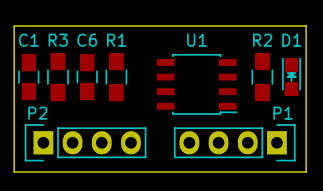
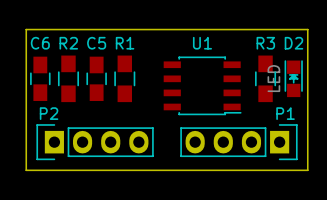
C1 name: C1 (28, 40) -> C6 (40, 43)
R3 name: R3 (58, 40) -> R2 (68, 43)
C6 name: C6 (87, 40) -> C5 (96, 43)
R2 name: R2 (262, 40) -> R3 (265, 43)
D1 name: D1 (291, 40) -> D2 (293, 43)
D1 value: none -> LED (273, 78)

